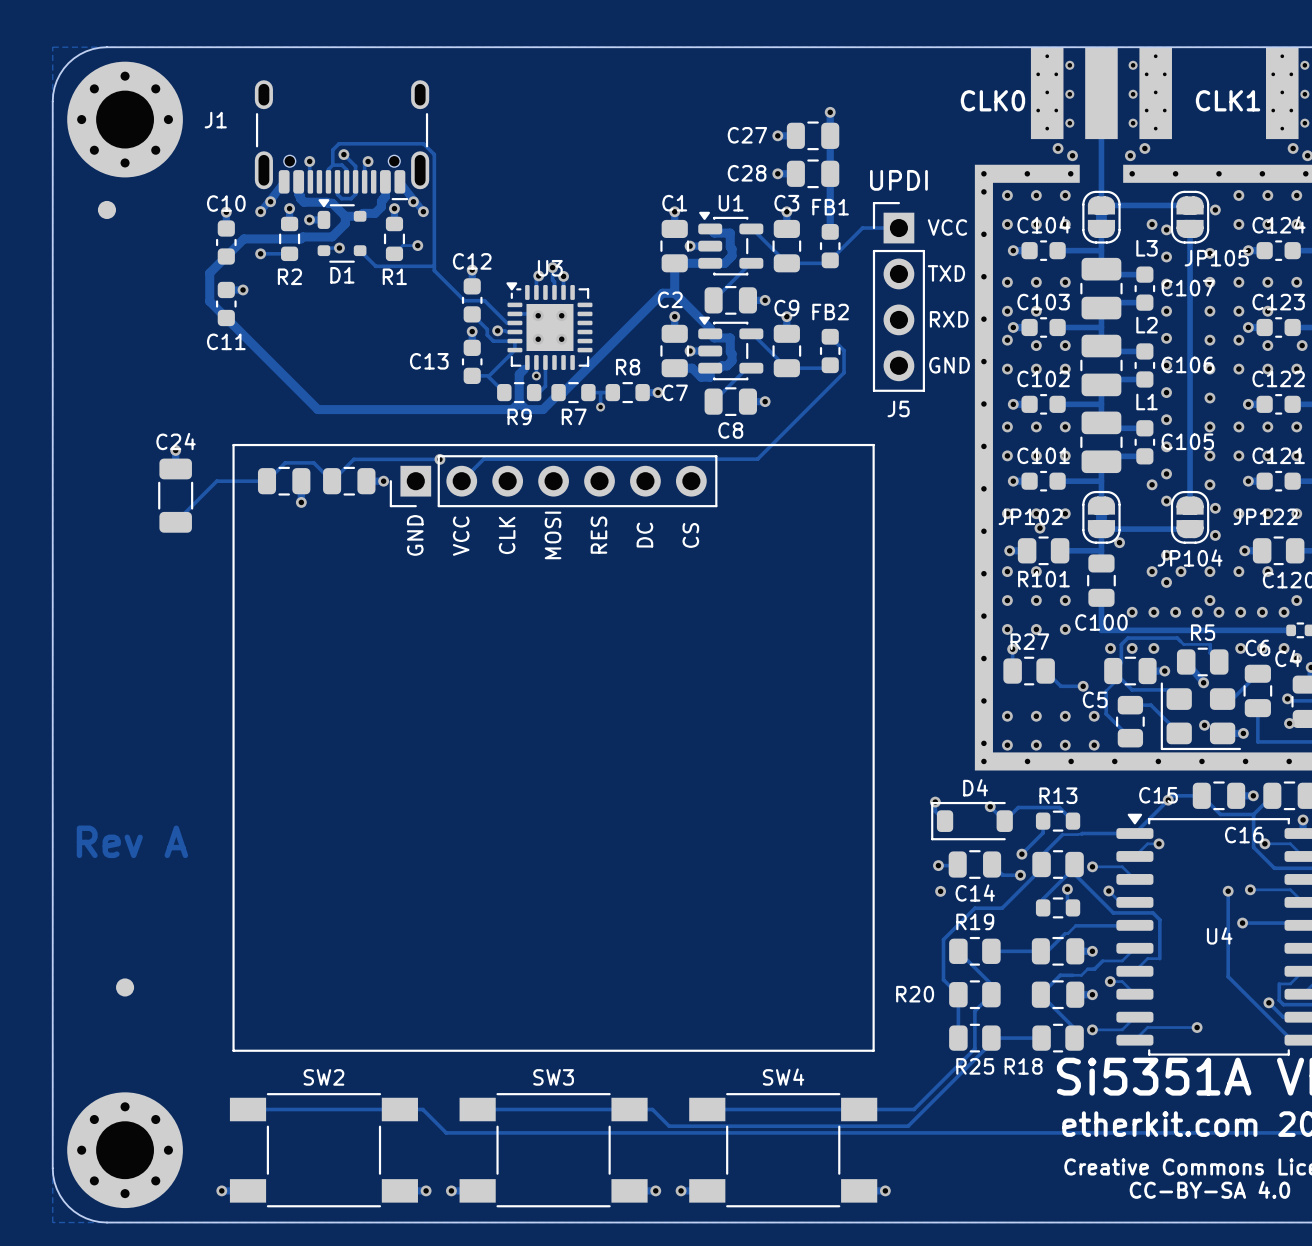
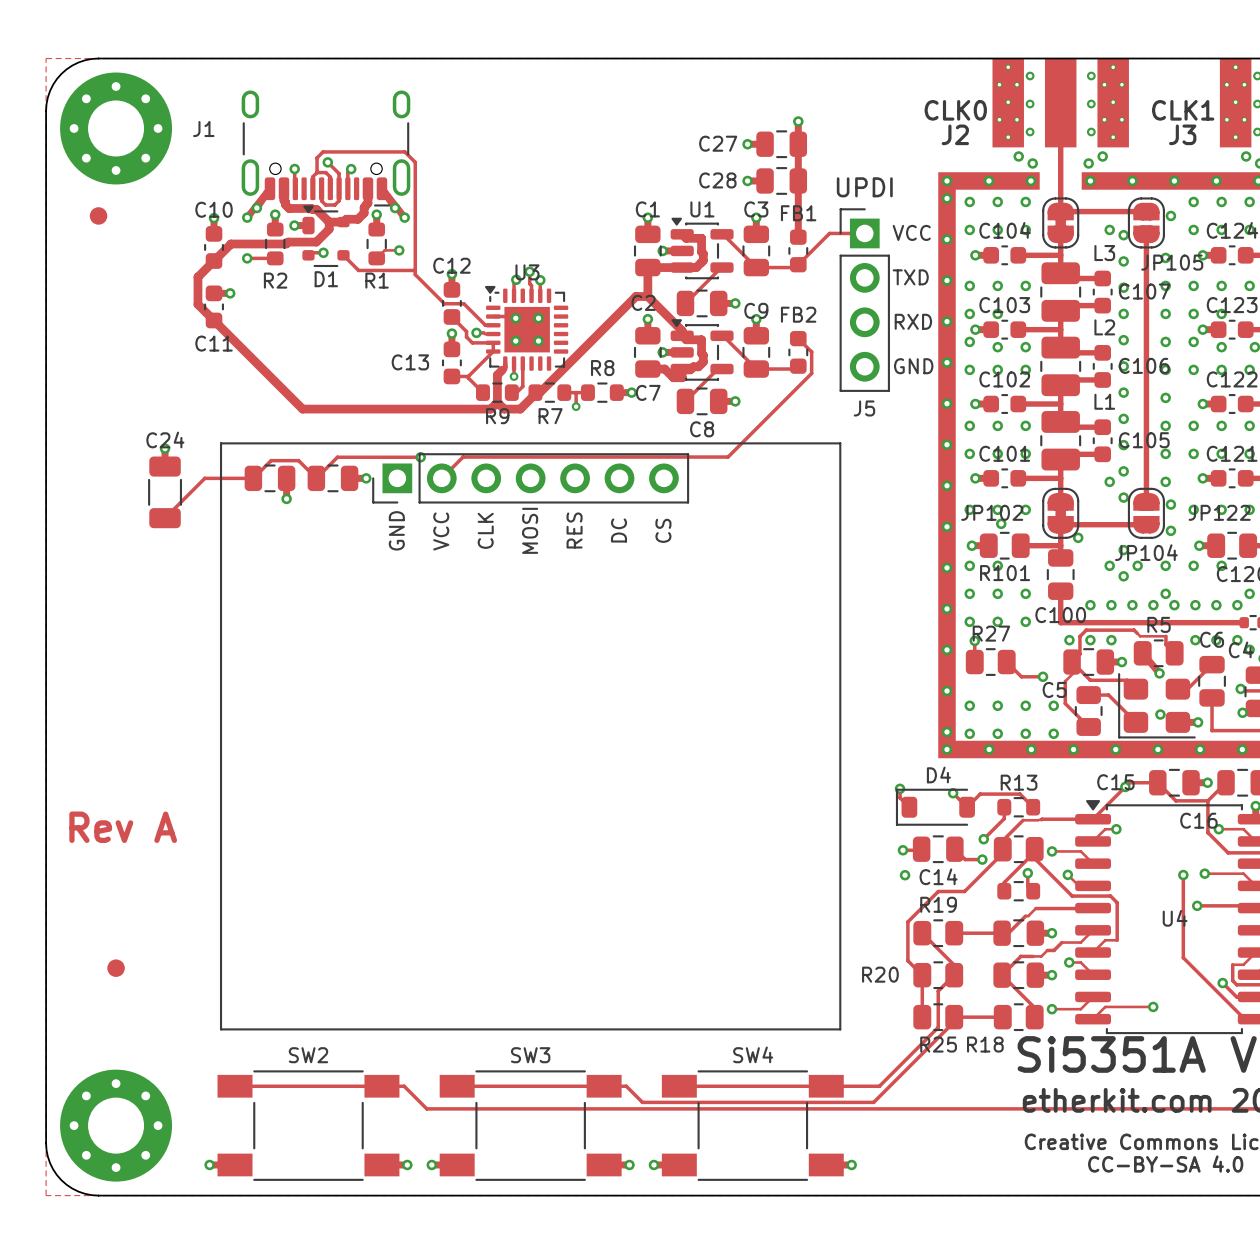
J2 name: none -> J2 (955, 134)
J3 name: none -> J3 (1182, 134)

